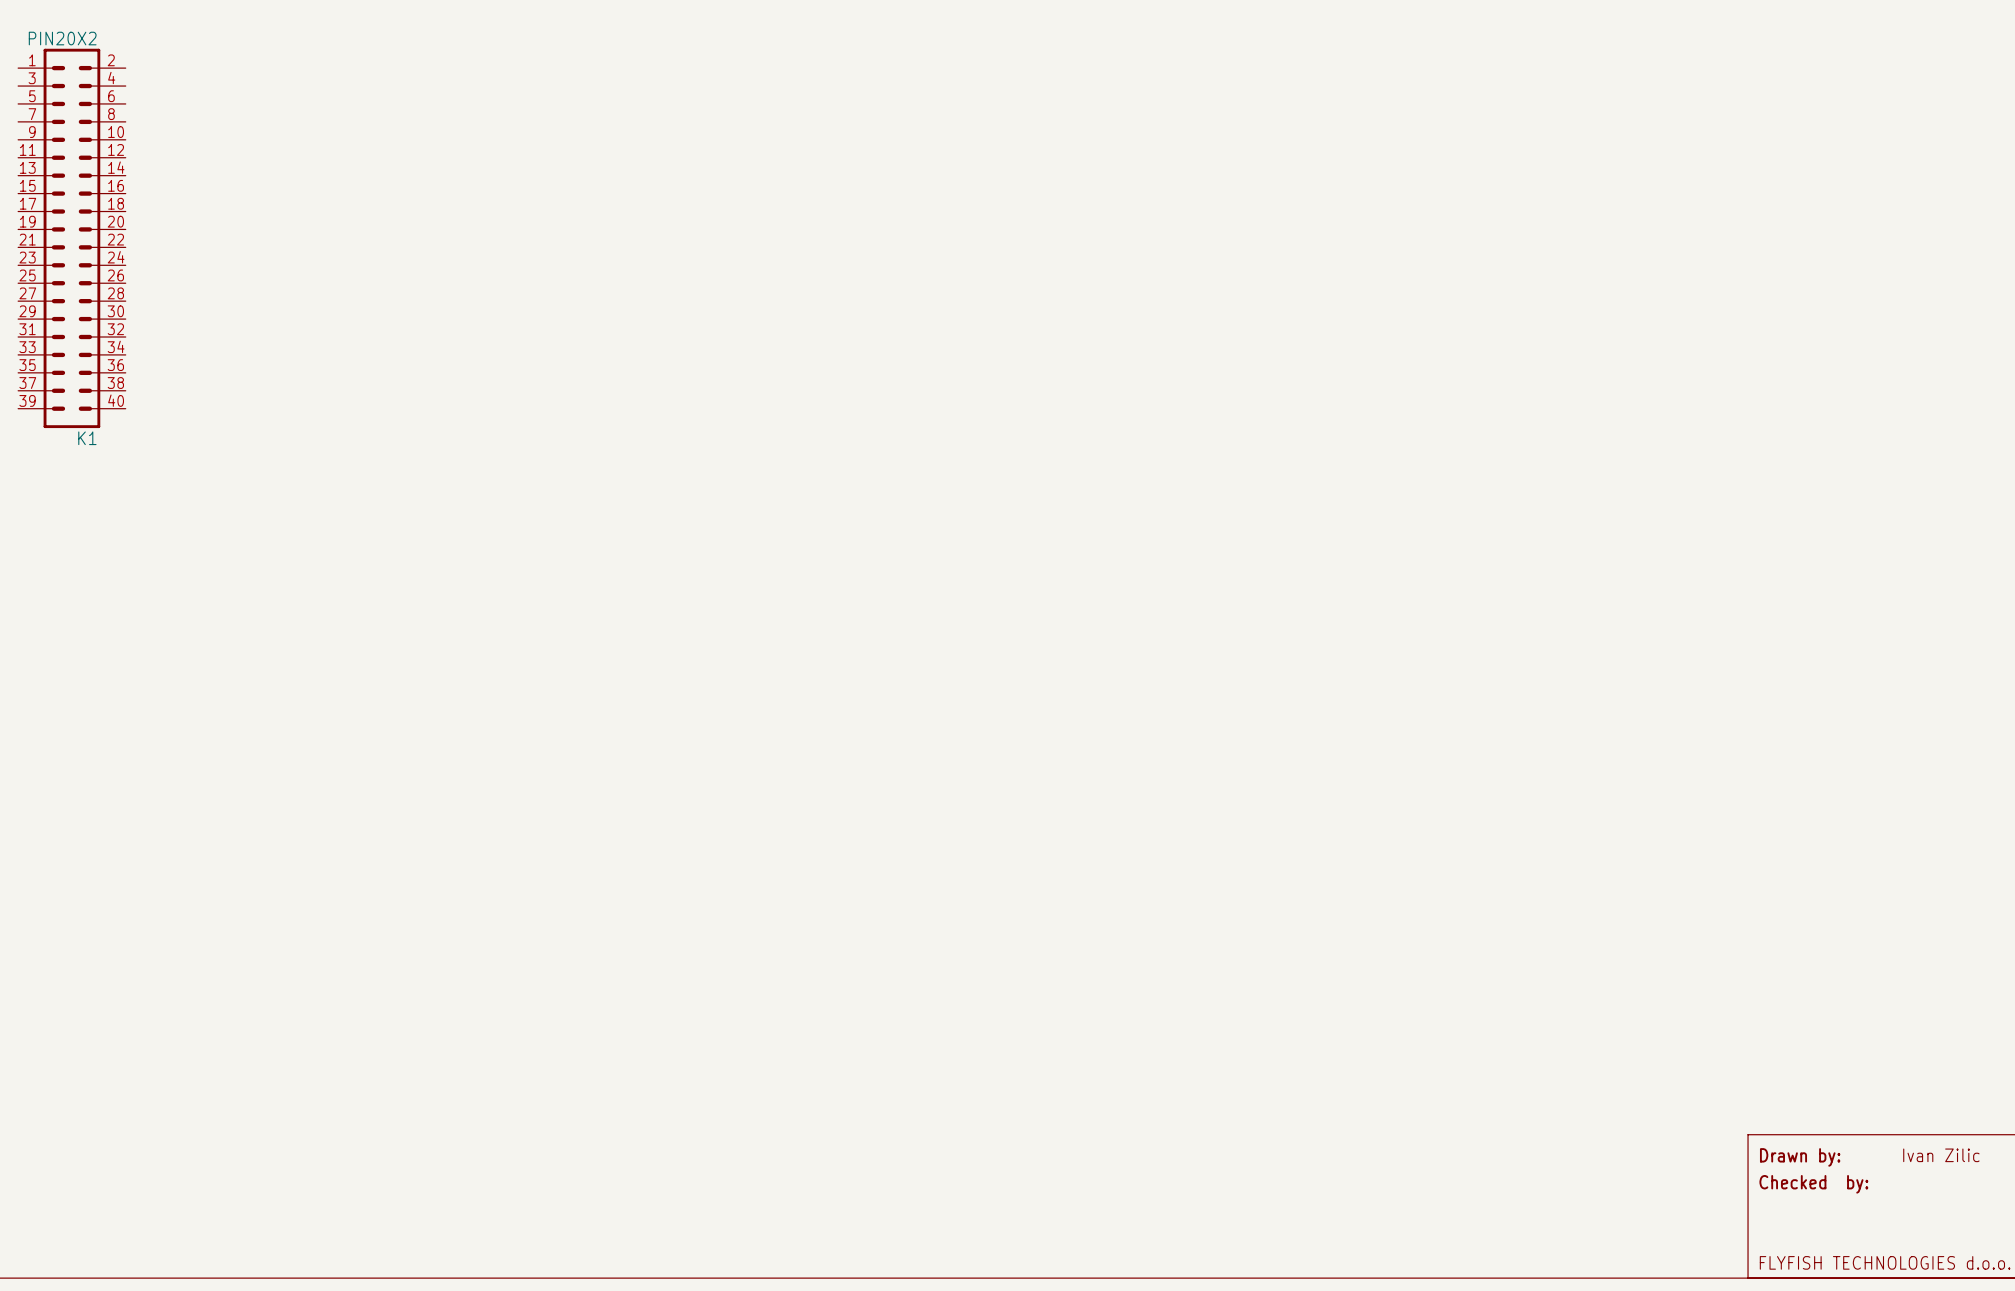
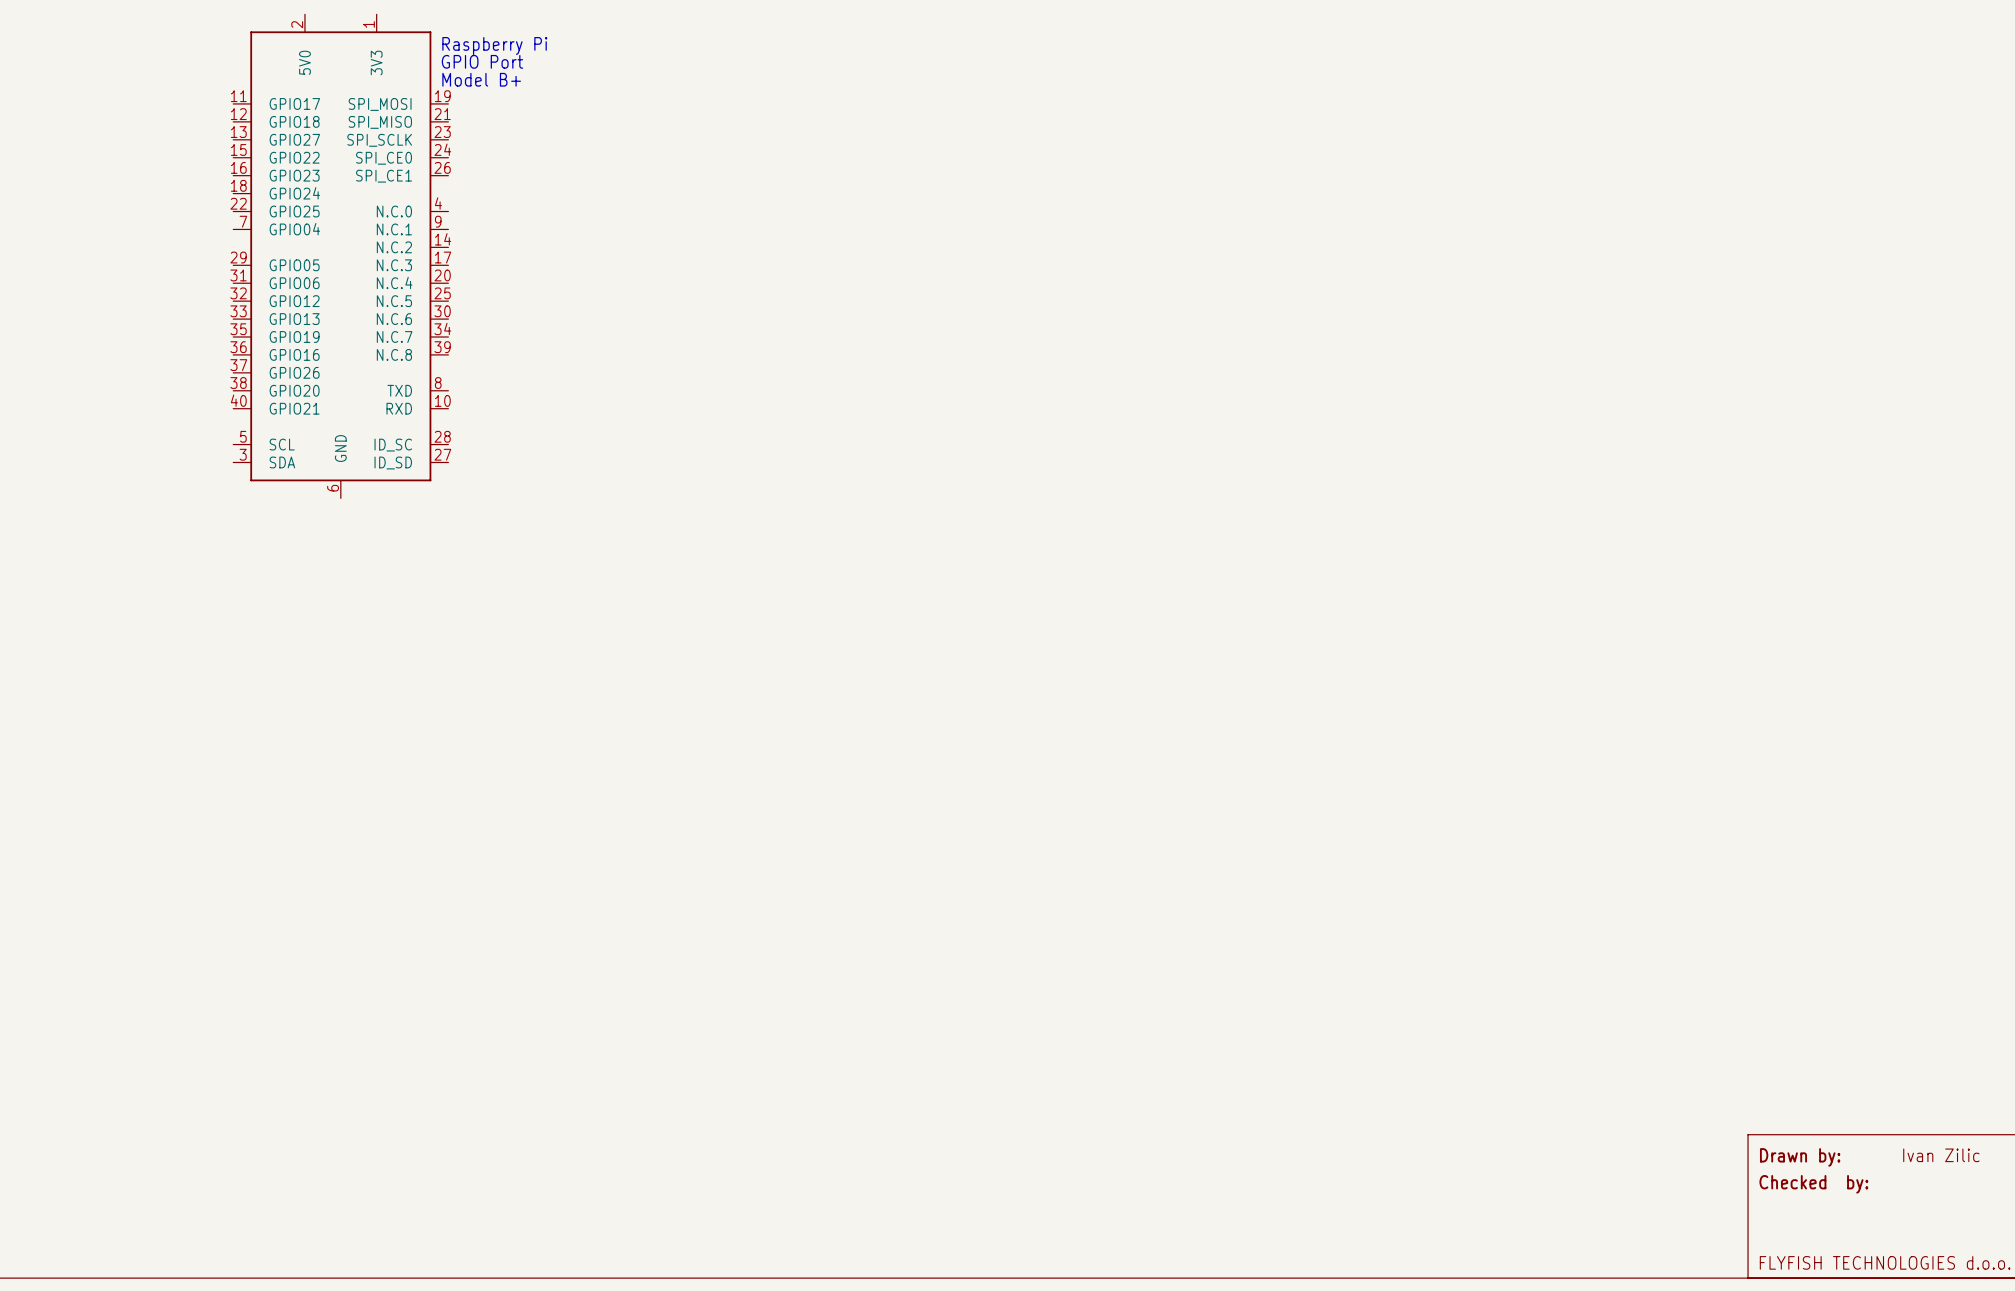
K1: PIN20X2 (71, 238) -> none
part: none -> (340, 256)

